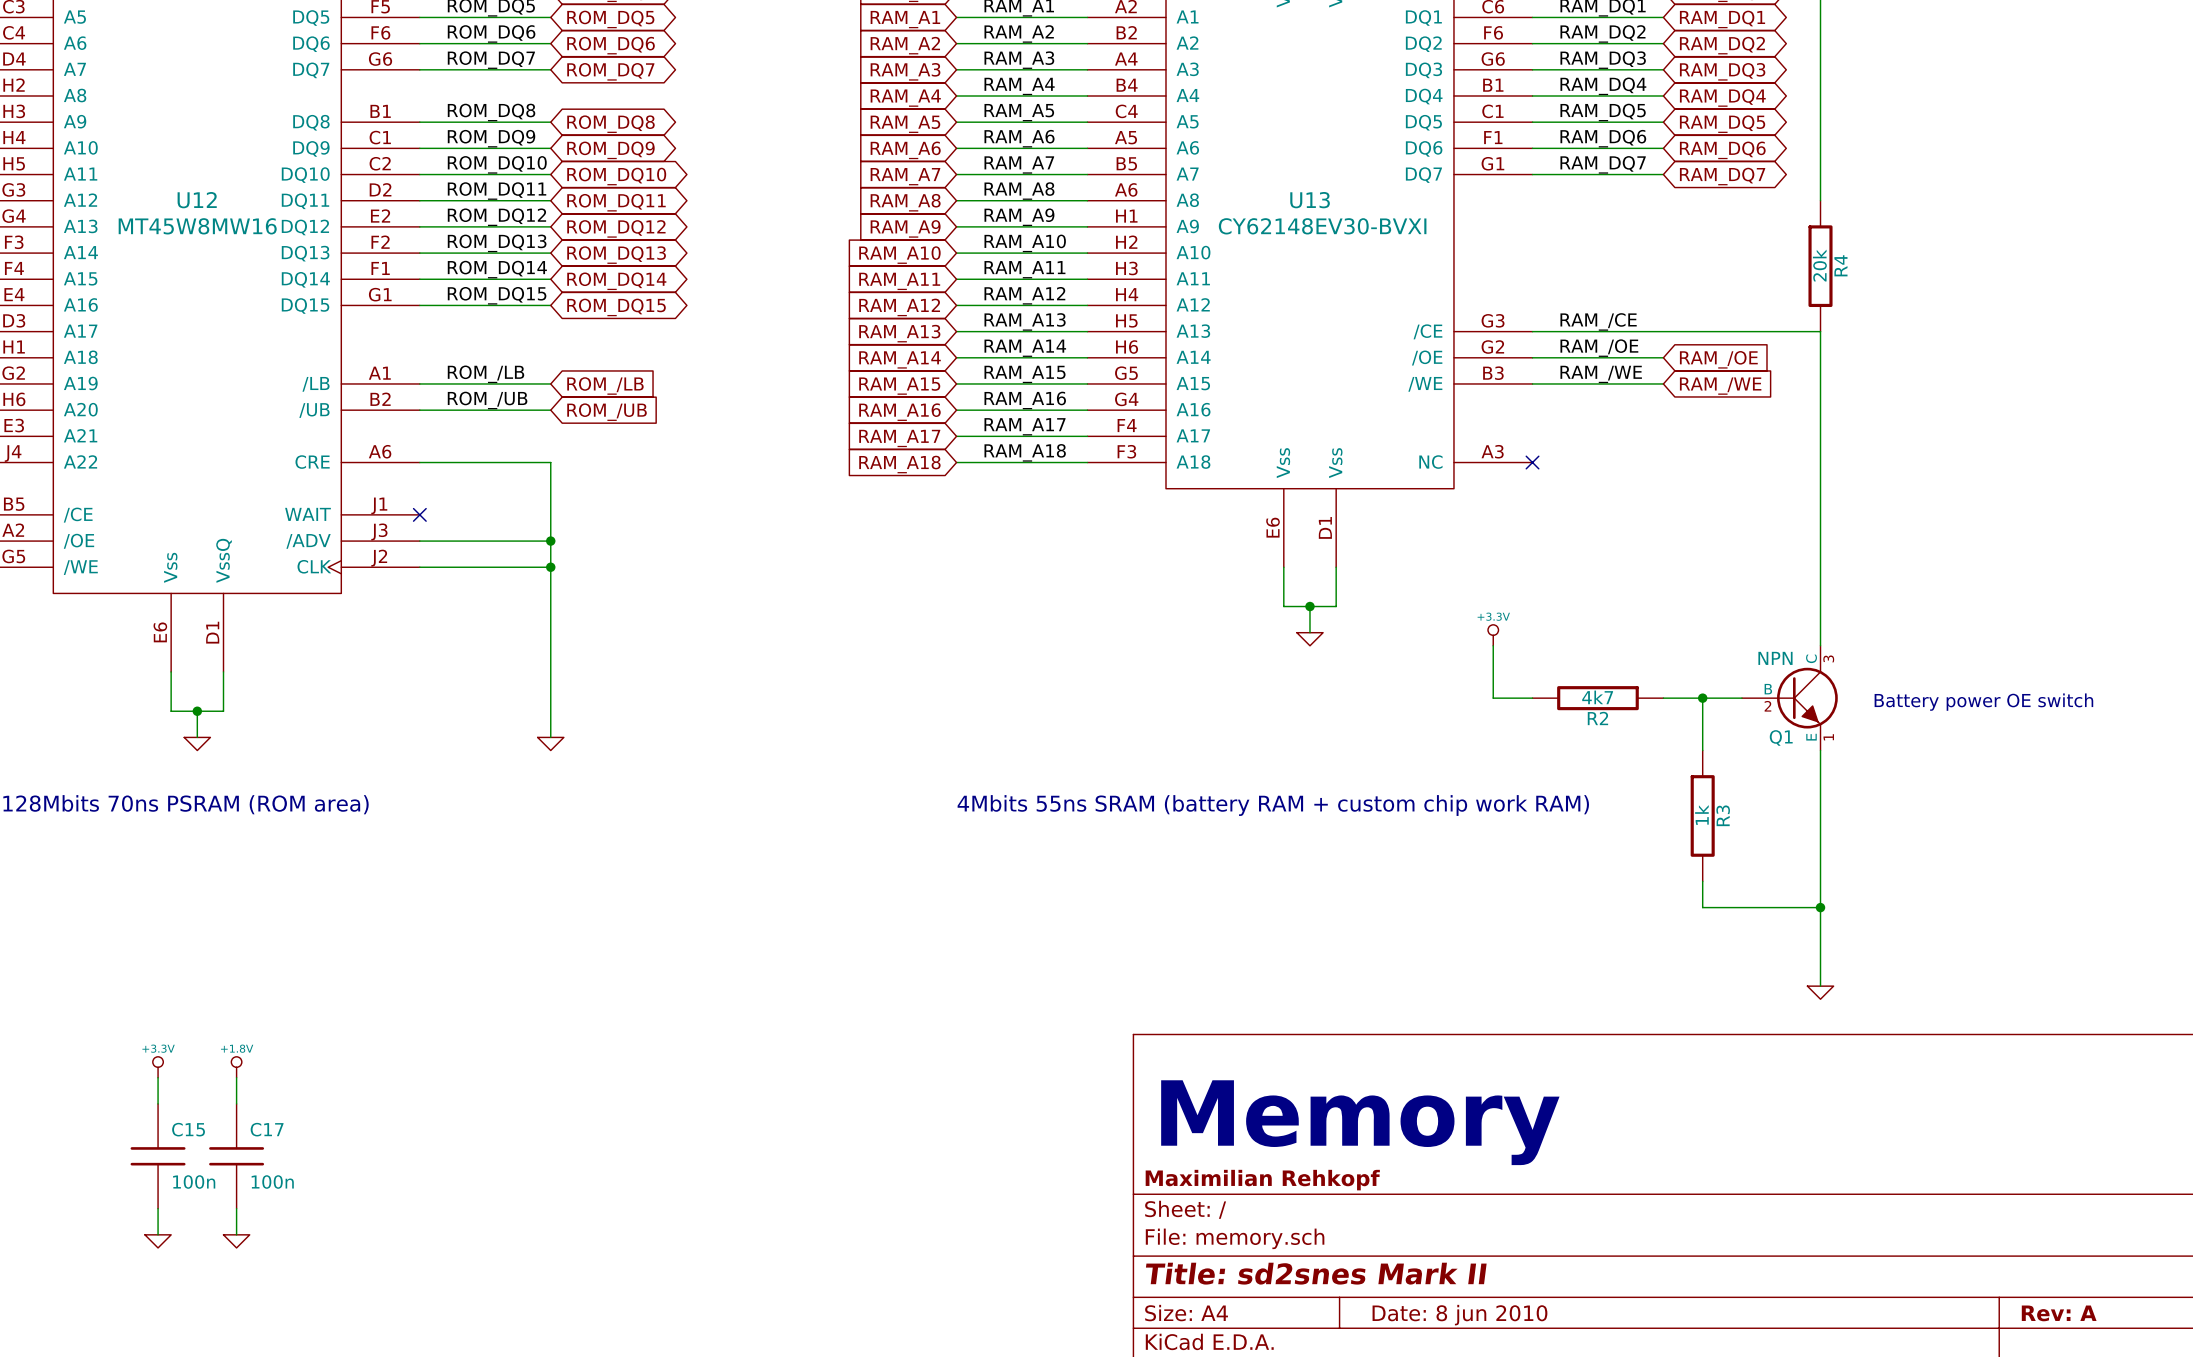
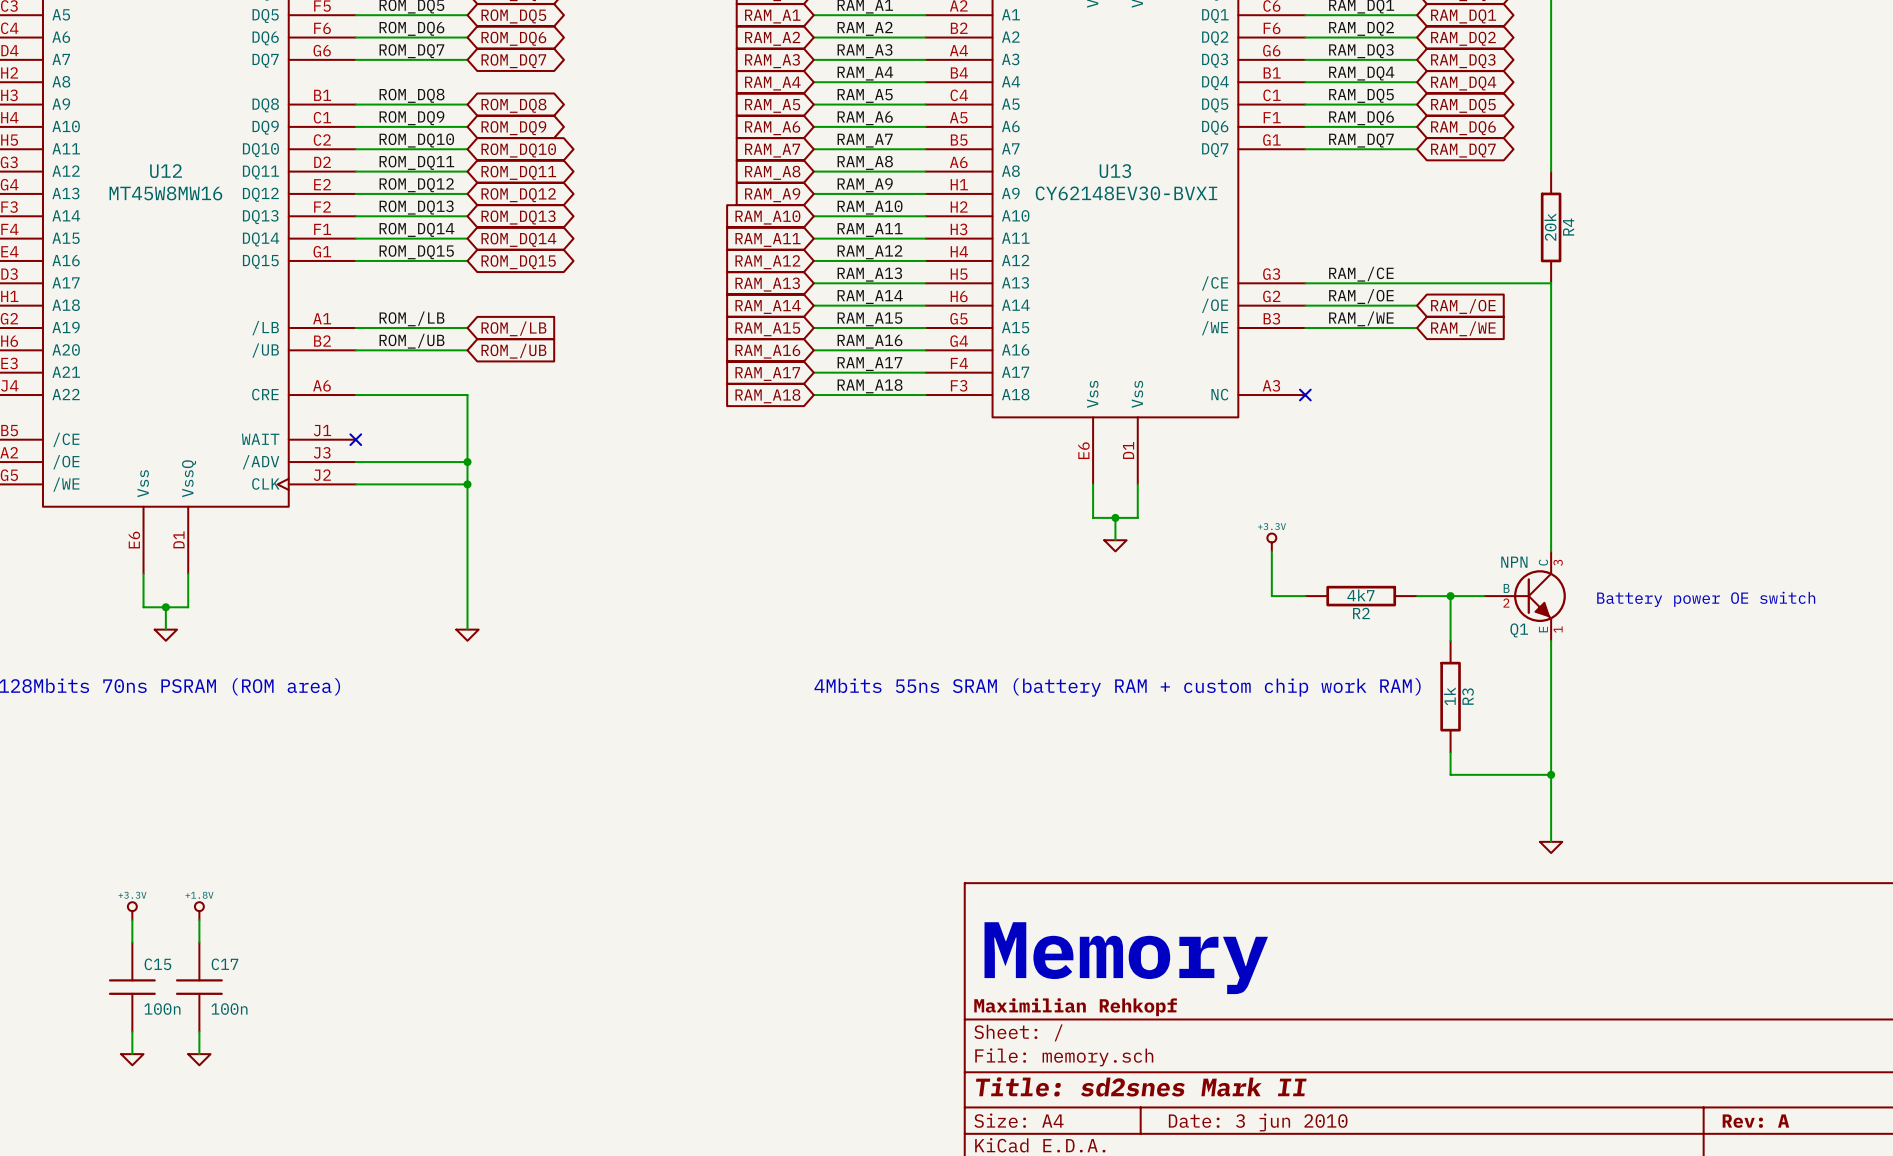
title block: Date: 8 jun 2010 (1459, 1315) -> Date: 3 jun 2010 (1258, 1122)

